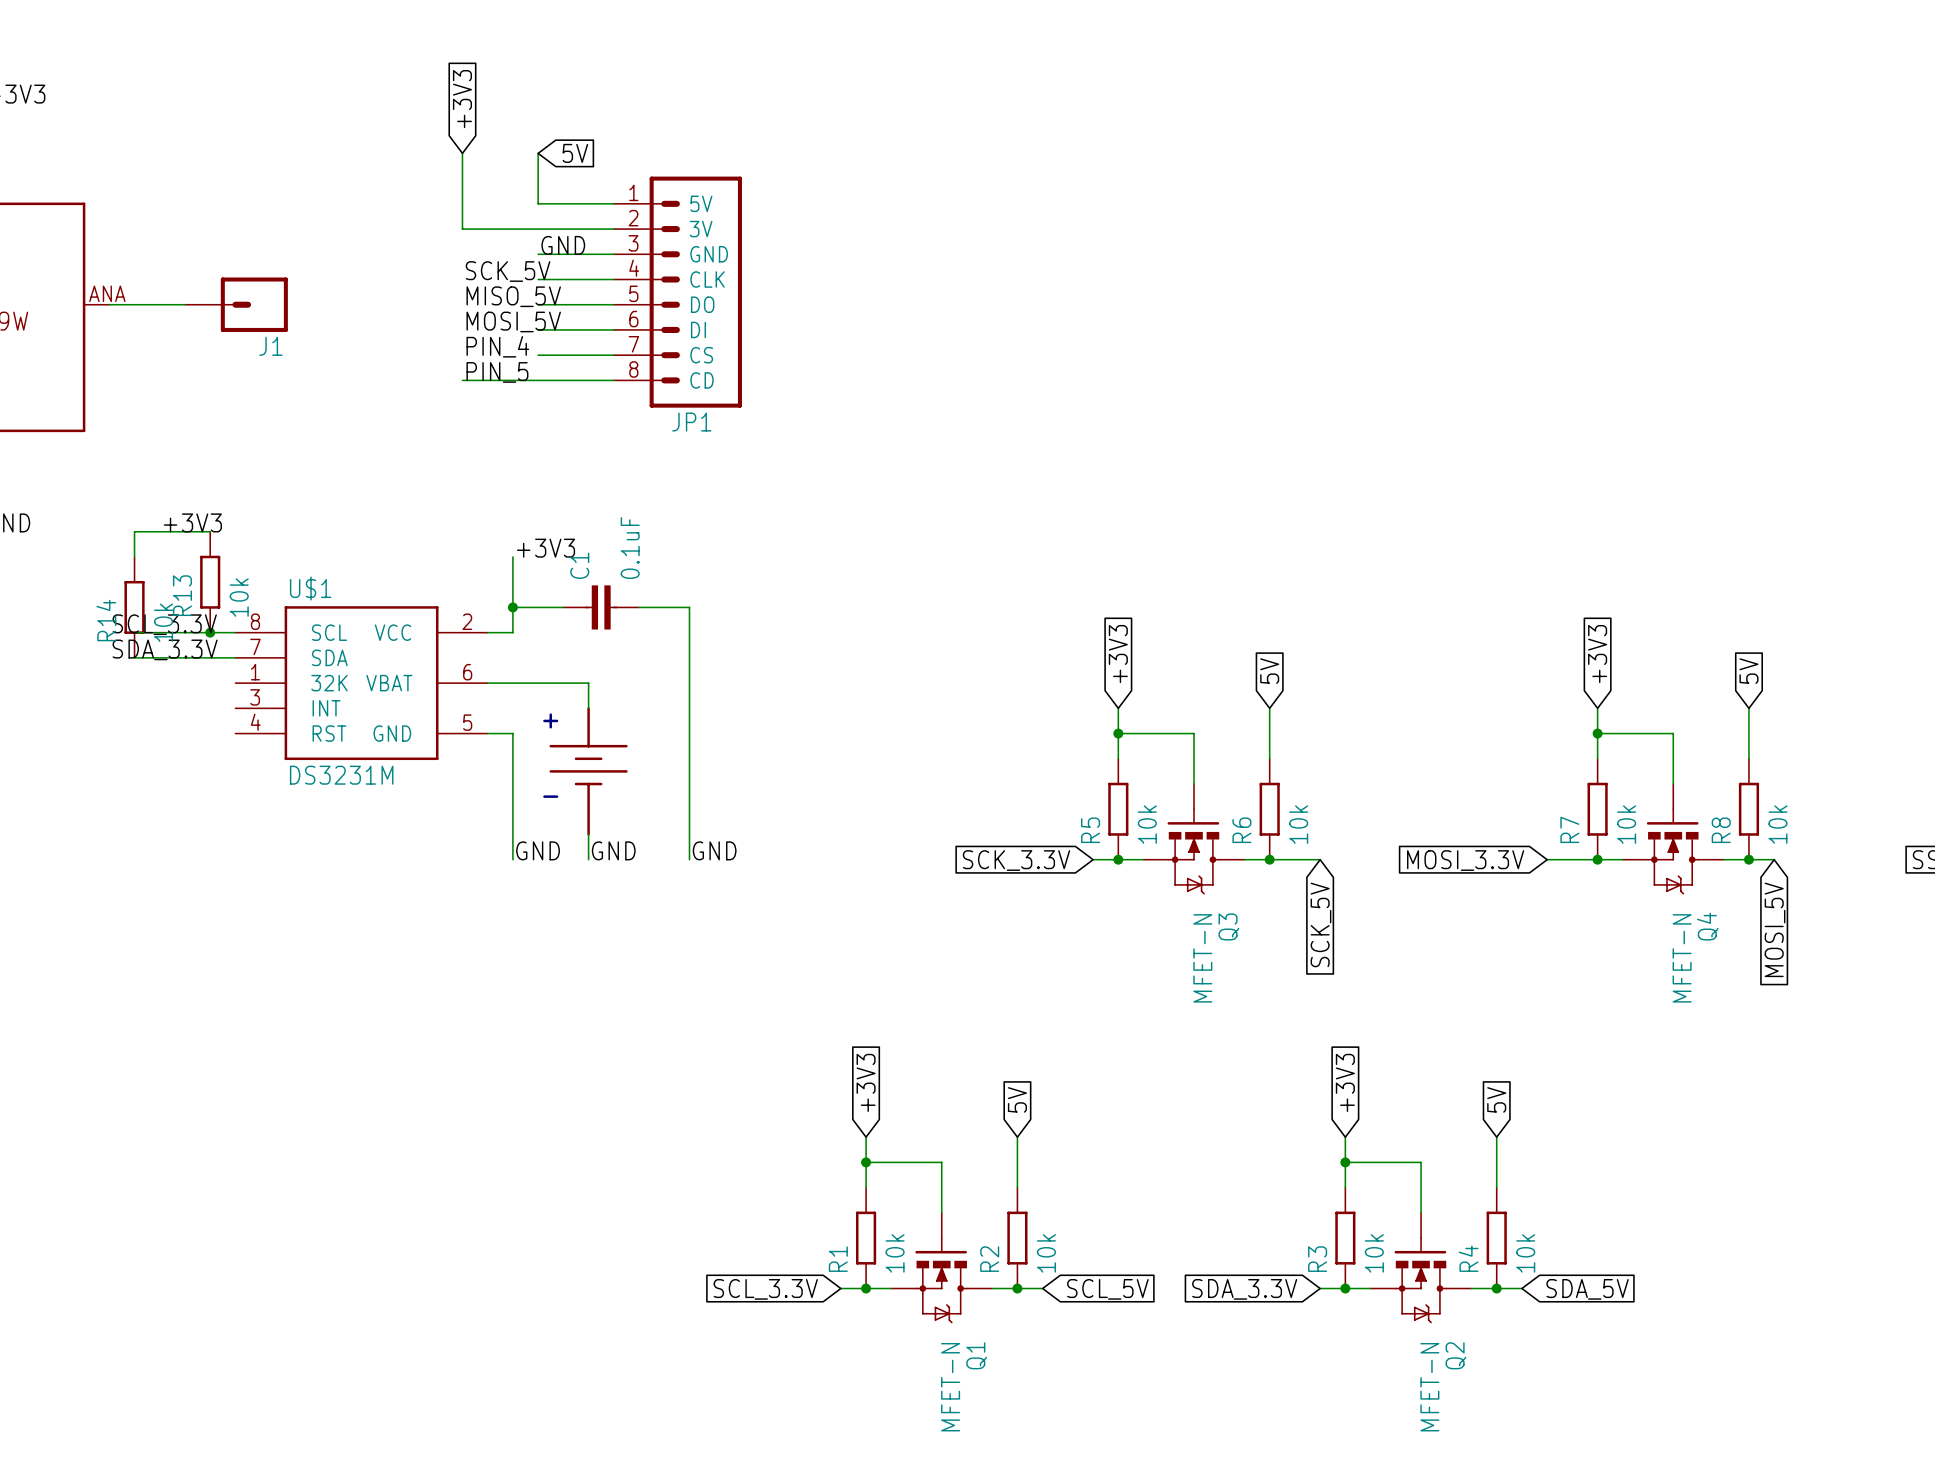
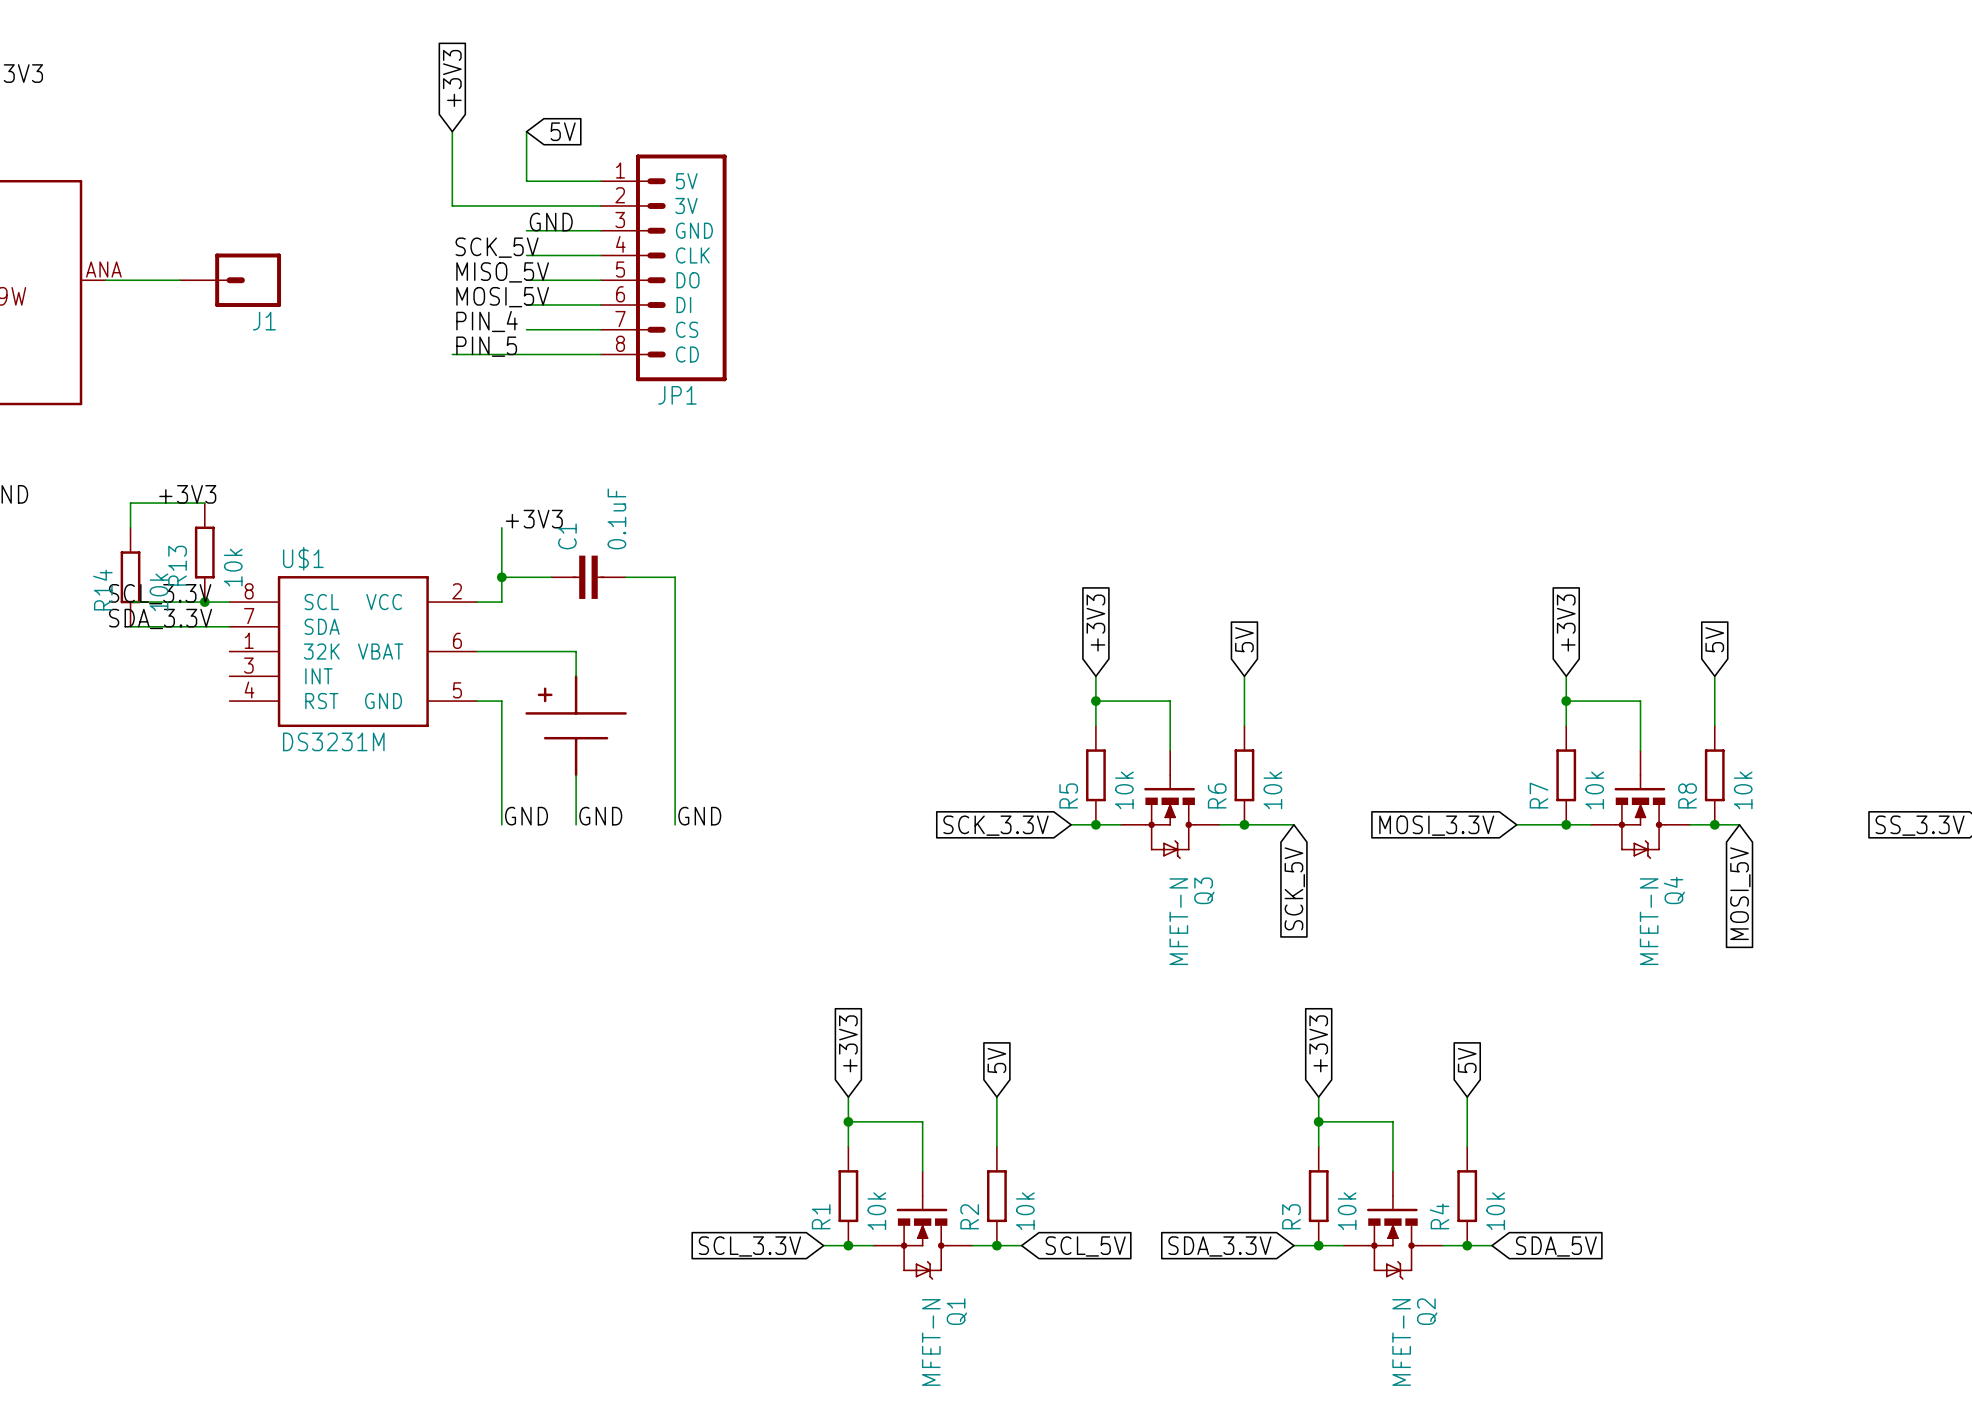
part: none -> (576, 725)
part: (585, 771) -> none

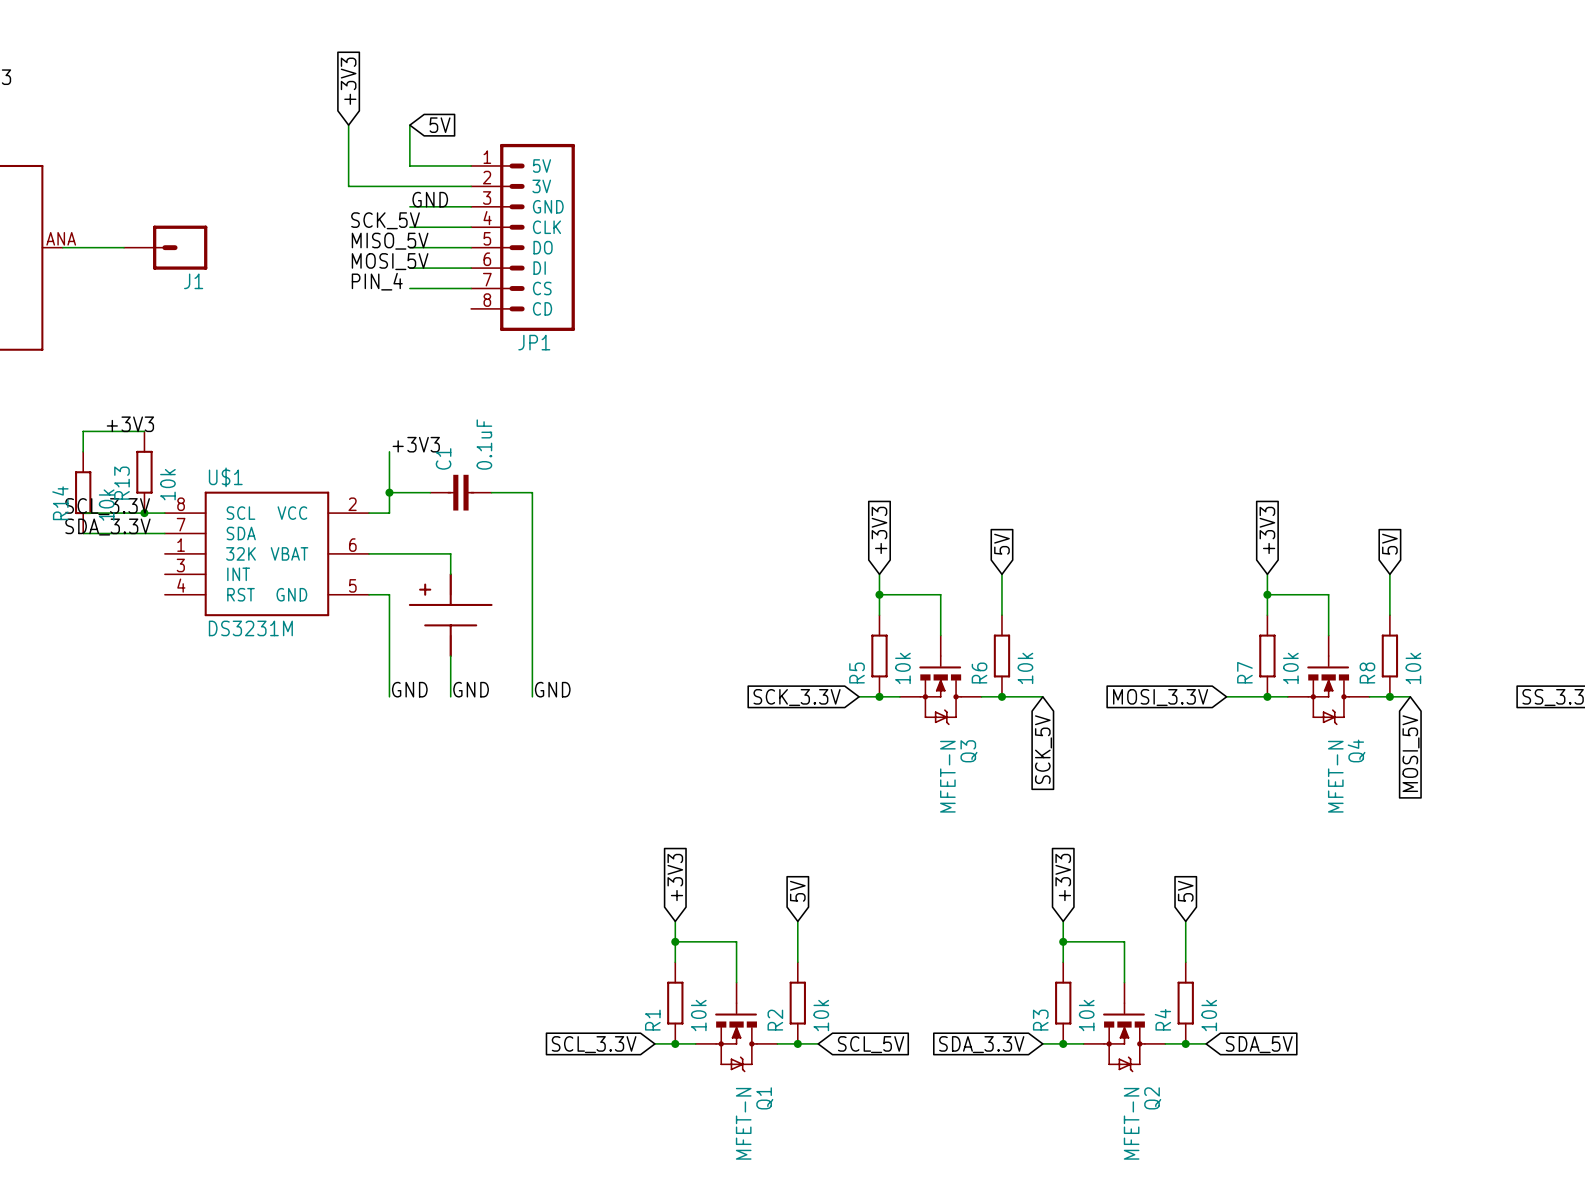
label: PIN_5 (486, 346) -> none
wire: (452, 354) (600, 354) -> none

